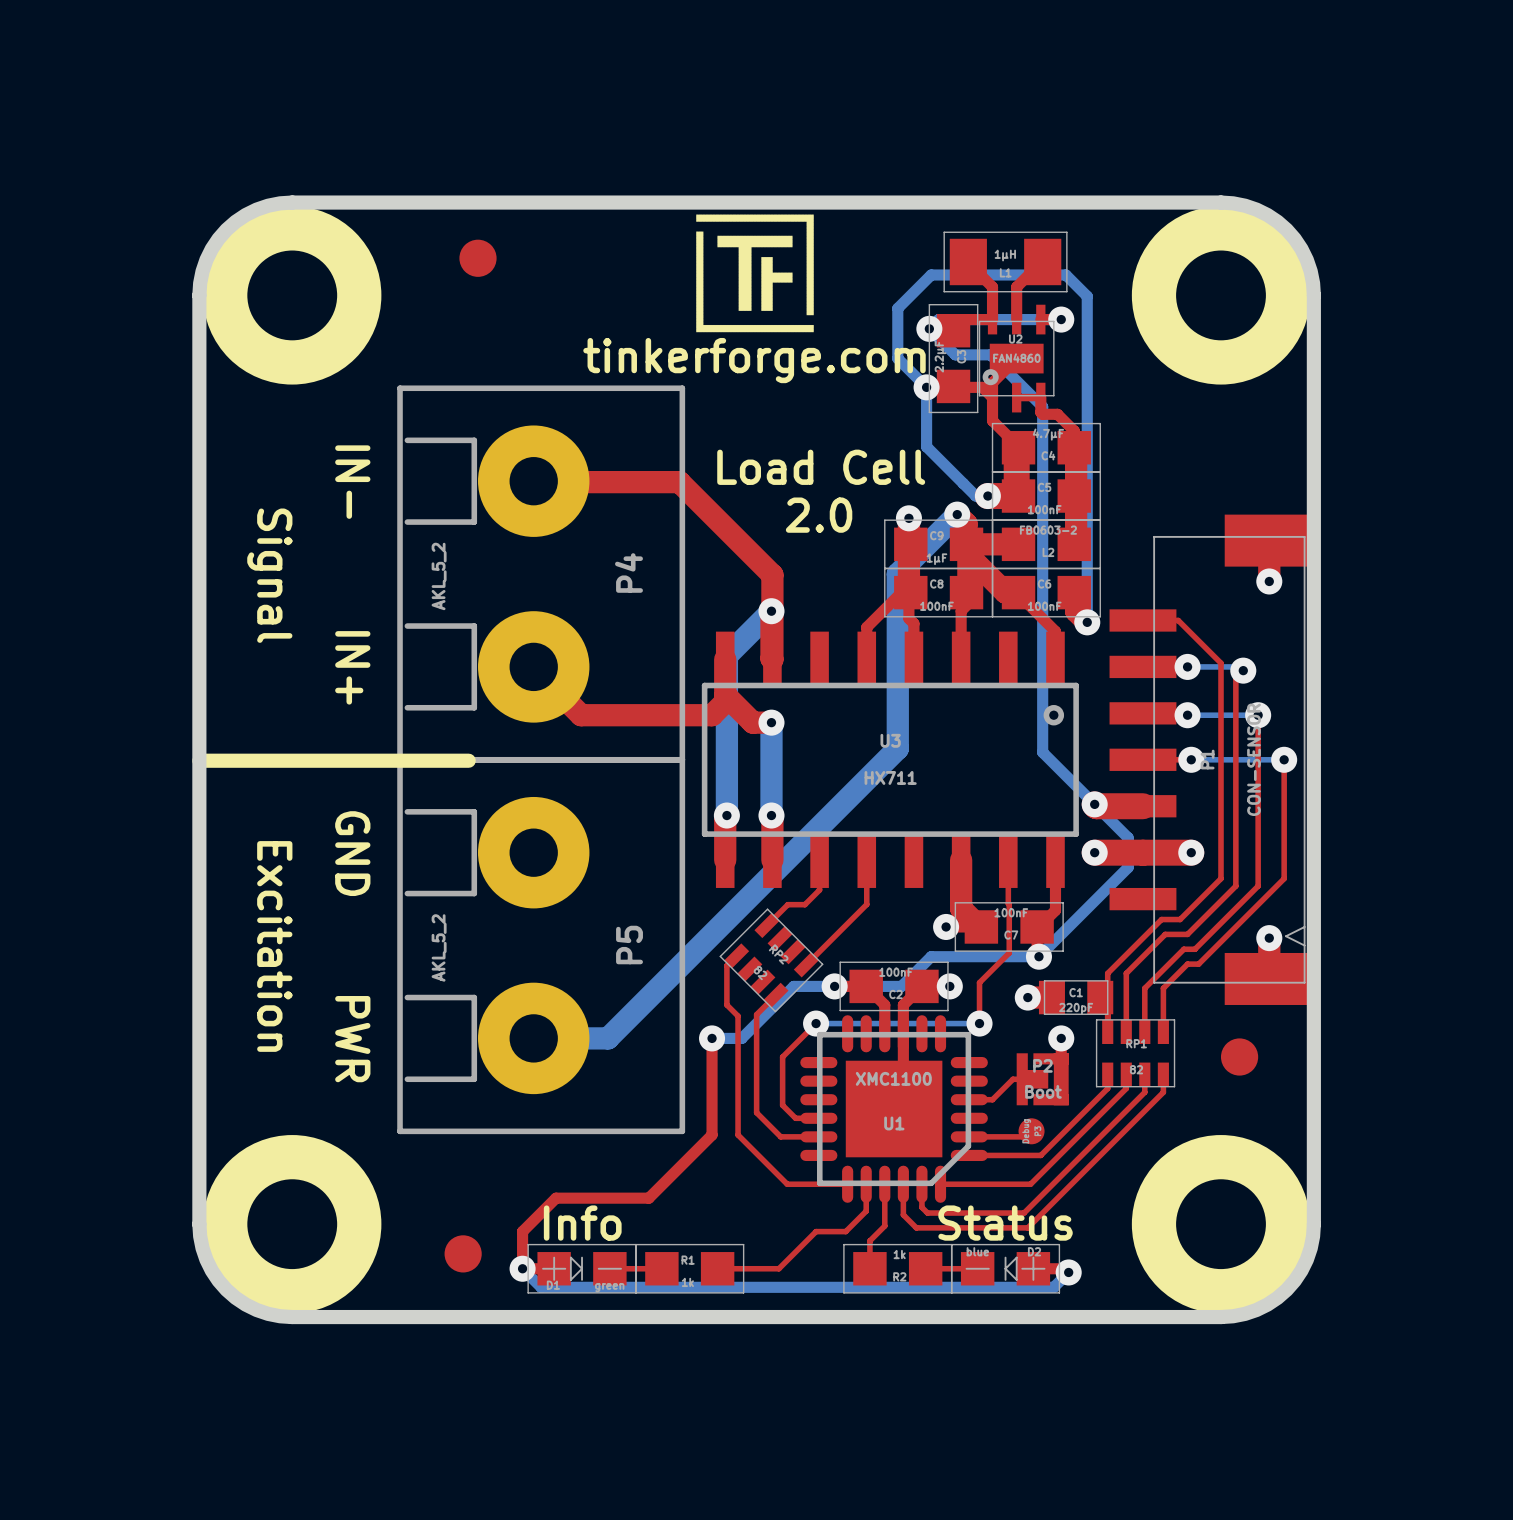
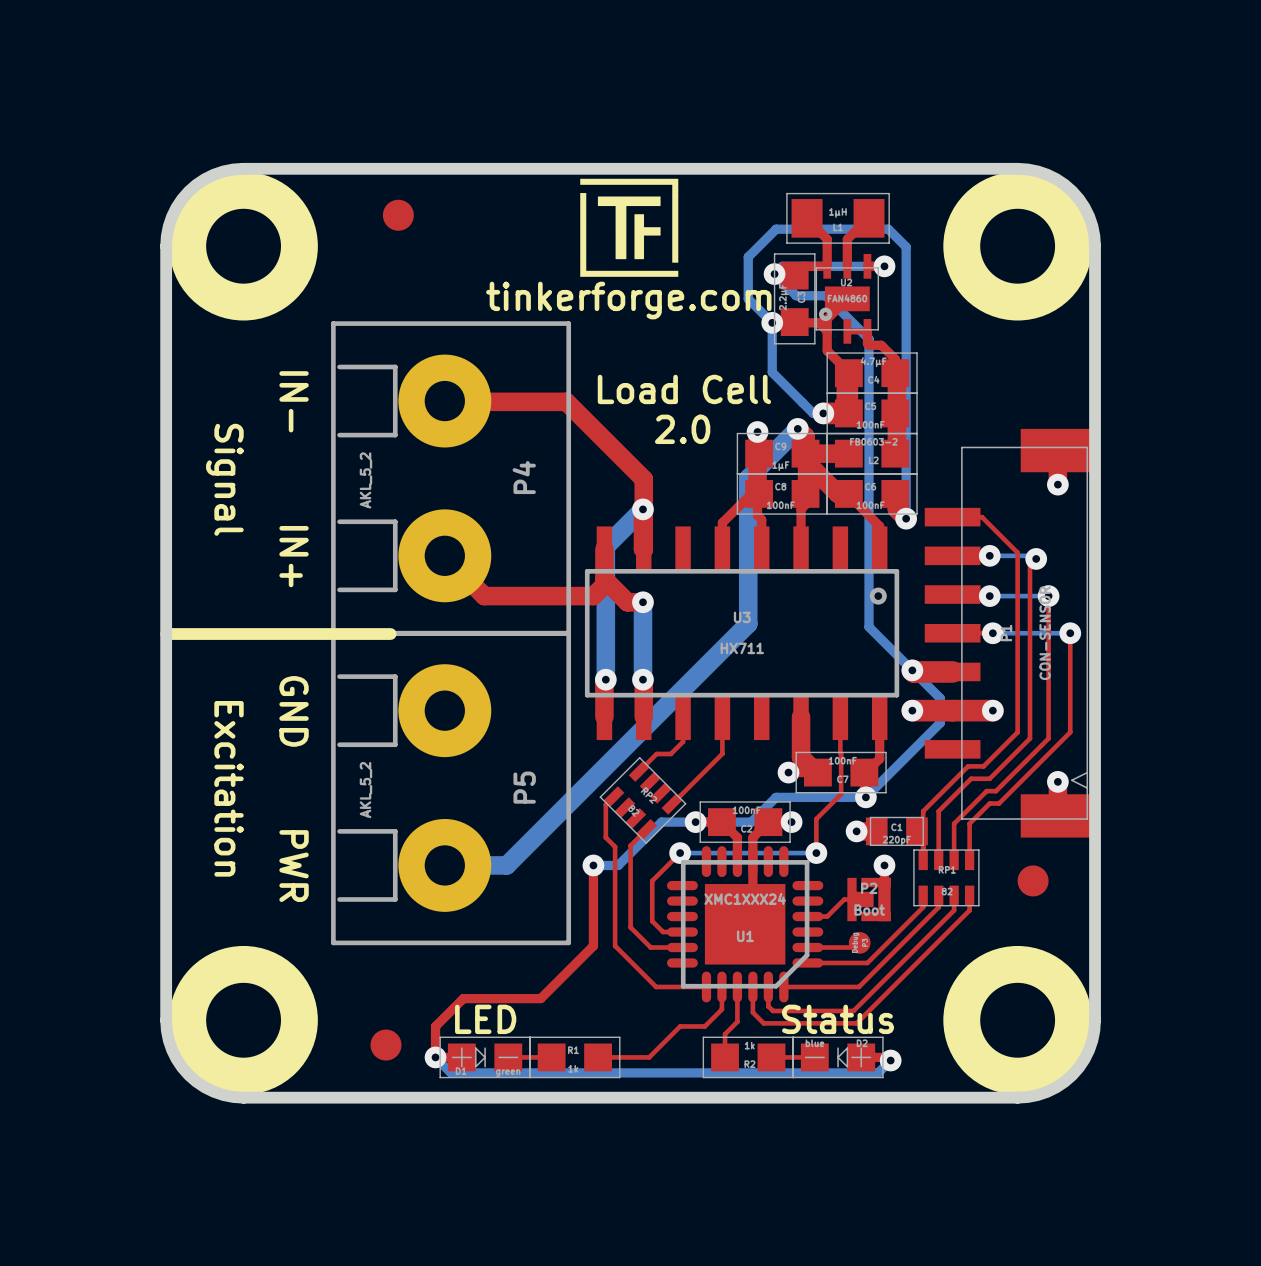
U1 value: XMC1100 (893, 1078) -> XMC1XXX24 (745, 898)
text: Info (582, 1223) -> LED (485, 1019)

